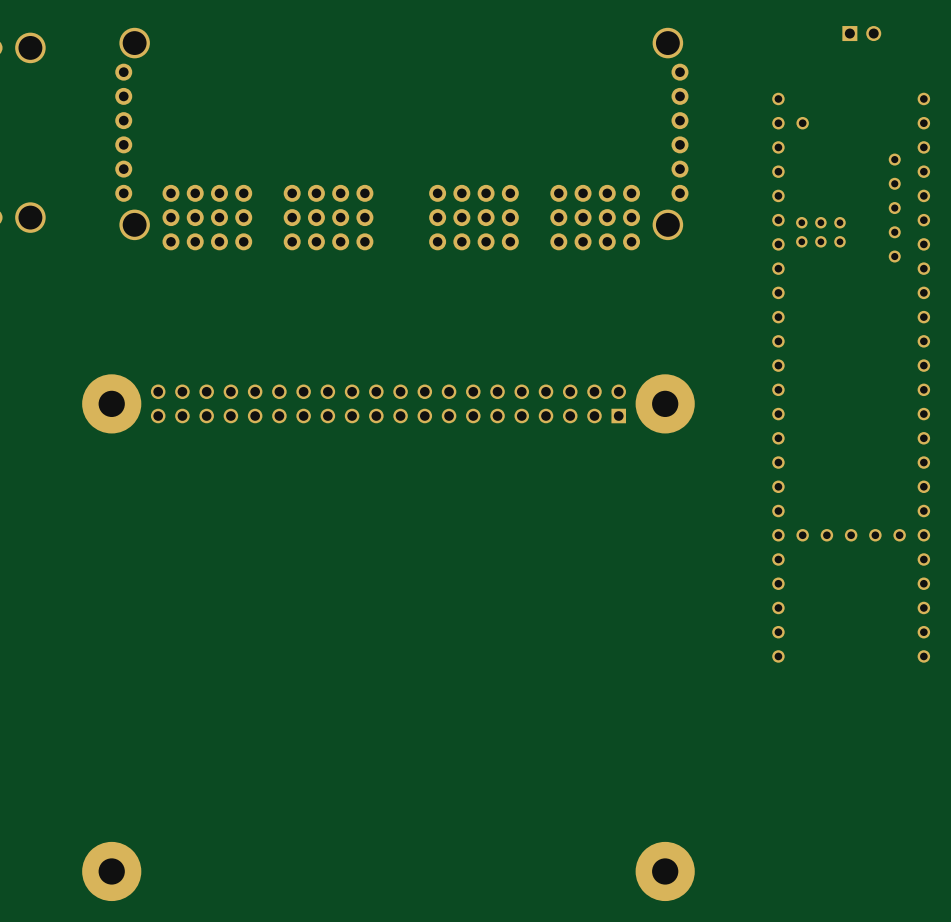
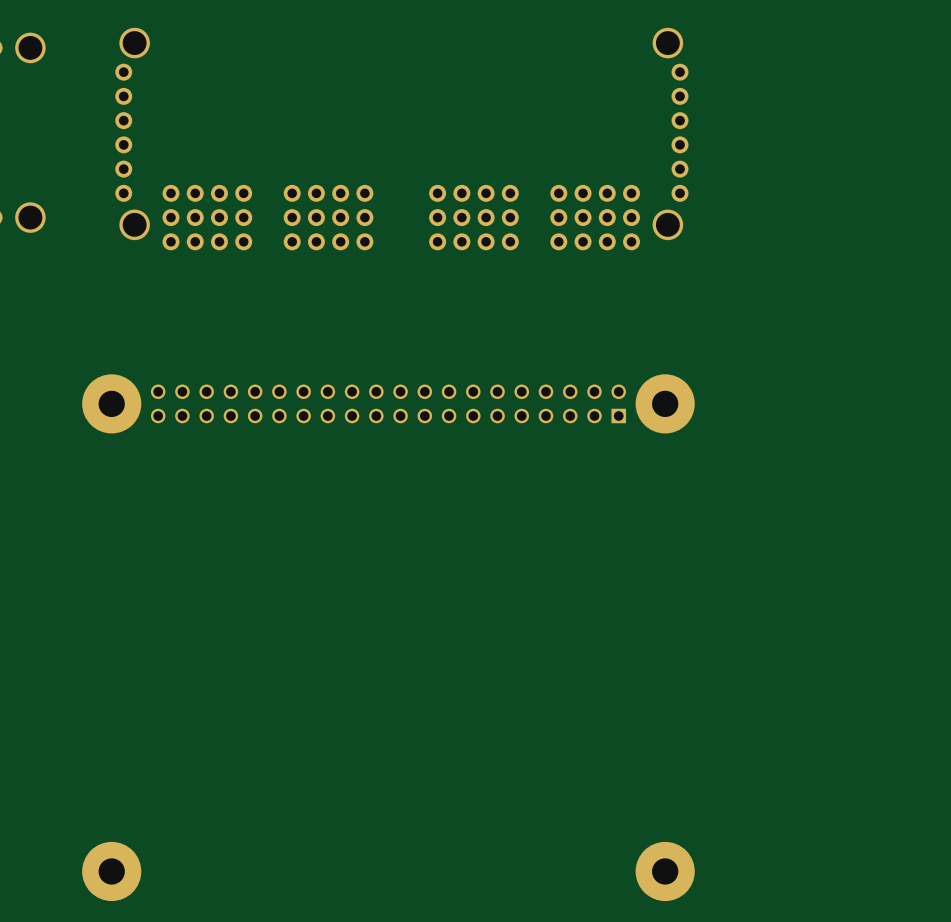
part: (861, 33) -> none
part: (851, 377) -> none

